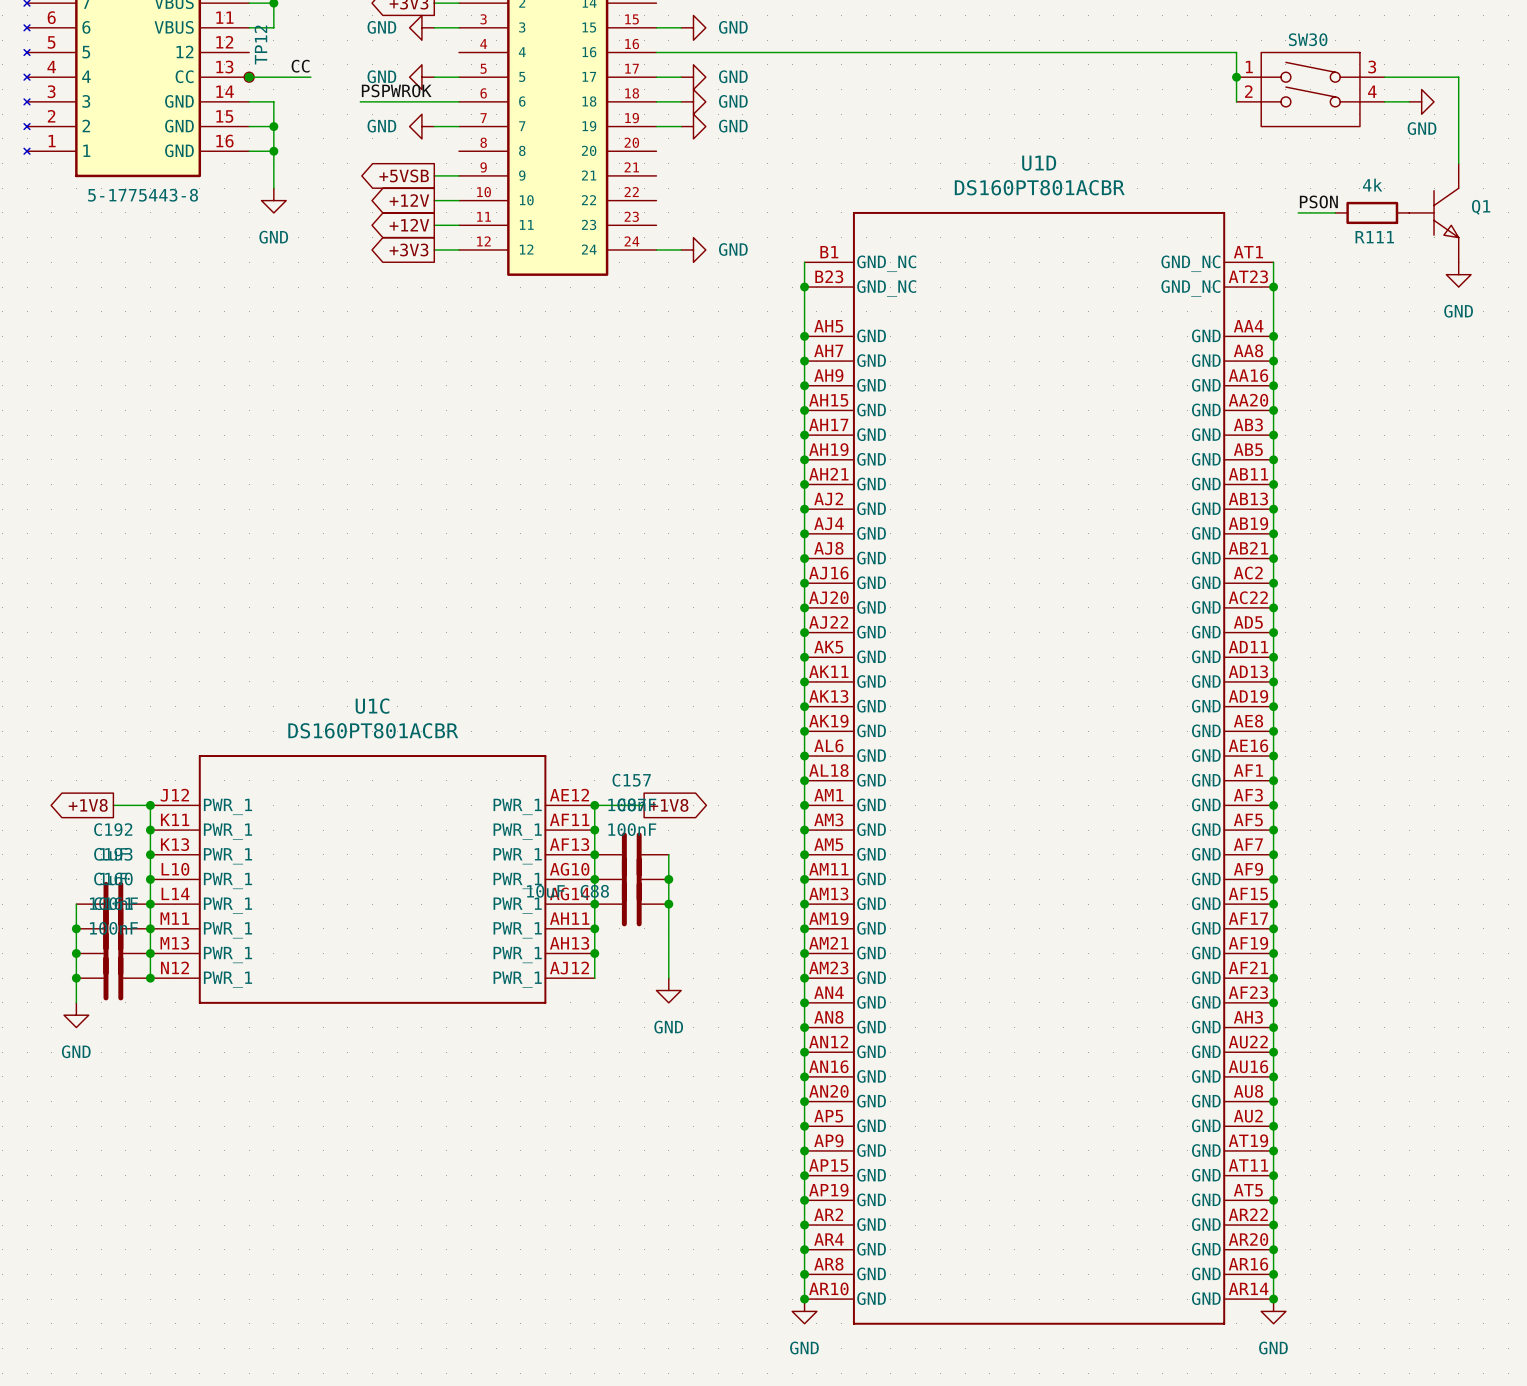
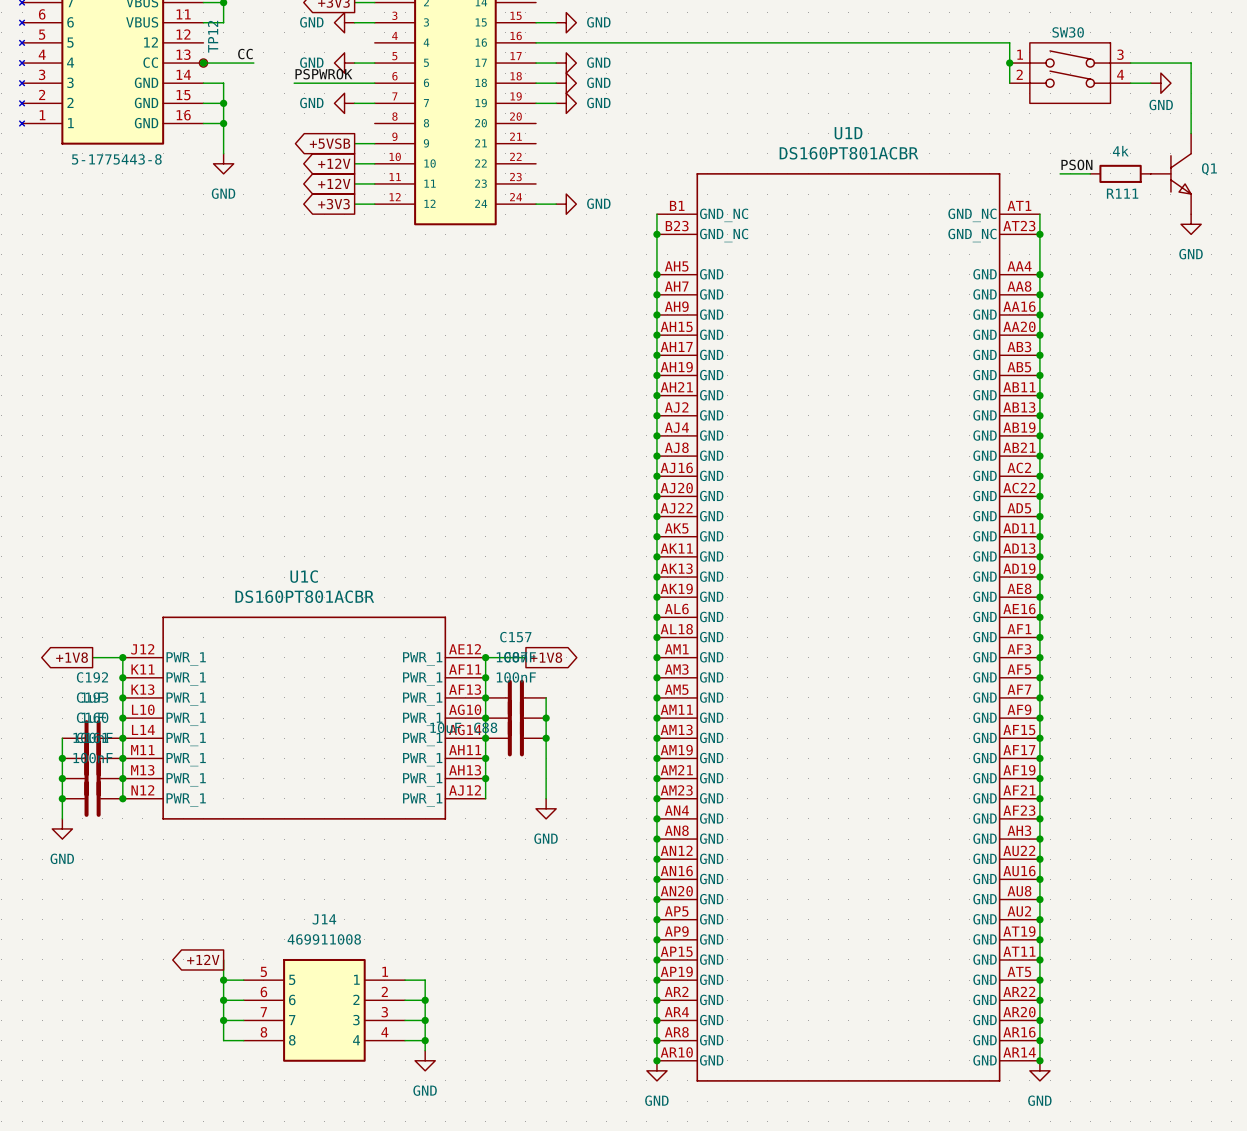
global label: none -> +12V (203, 959)
wire: none -> (223, 959) (223, 1040) (243, 1040)
wire: none -> (223, 980) (243, 980)
junction: none -> (223, 980)
wire: none -> (405, 980) (425, 980) (425, 1050)
wire: none -> (223, 1000) (243, 1000)
junction: none -> (223, 1000)
wire: none -> (405, 1000) (425, 1000)
junction: none -> (425, 1000)
J14: none -> 469911008 (324, 1010)
wire: none -> (223, 1020) (243, 1020)
junction: none -> (223, 1020)
wire: none -> (405, 1020) (425, 1020)
junction: none -> (425, 1020)
wire: none -> (405, 1040) (425, 1040)
junction: none -> (425, 1040)
power symbol: none -> GND (425, 1060)

